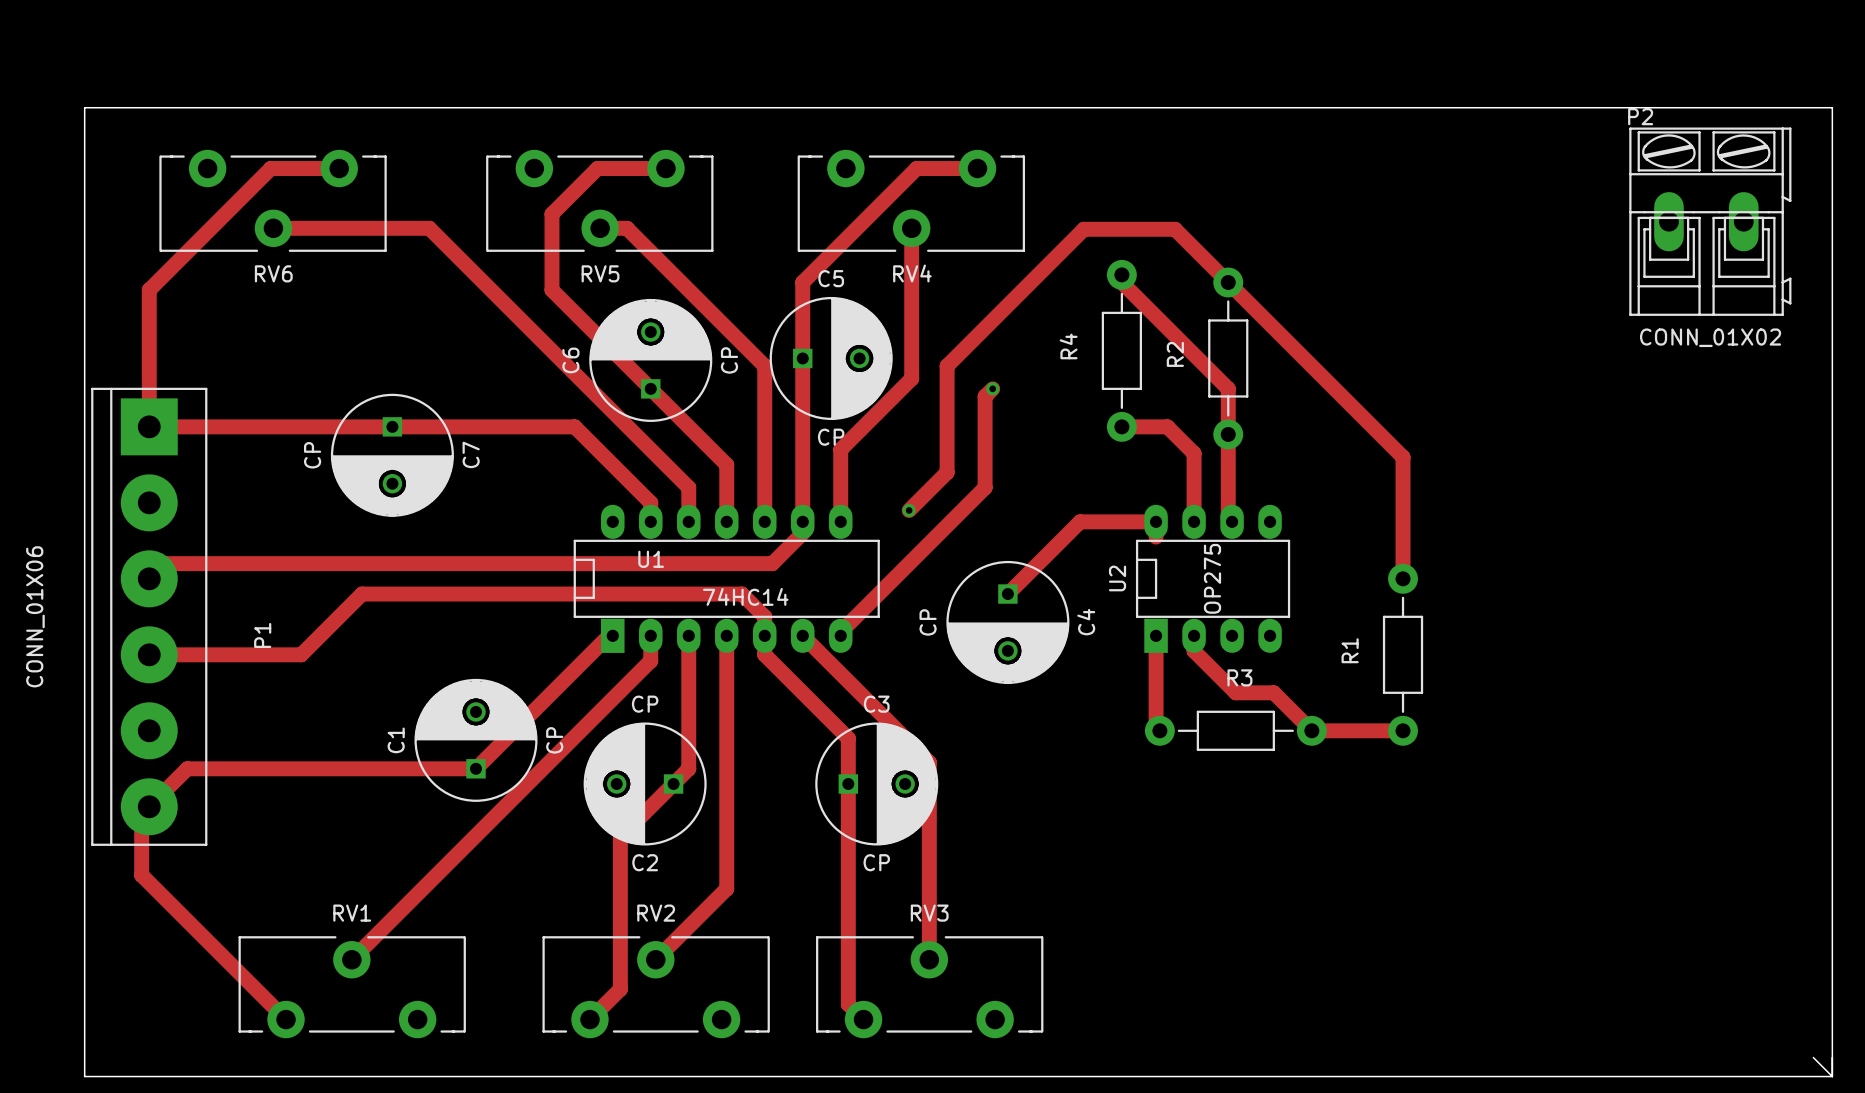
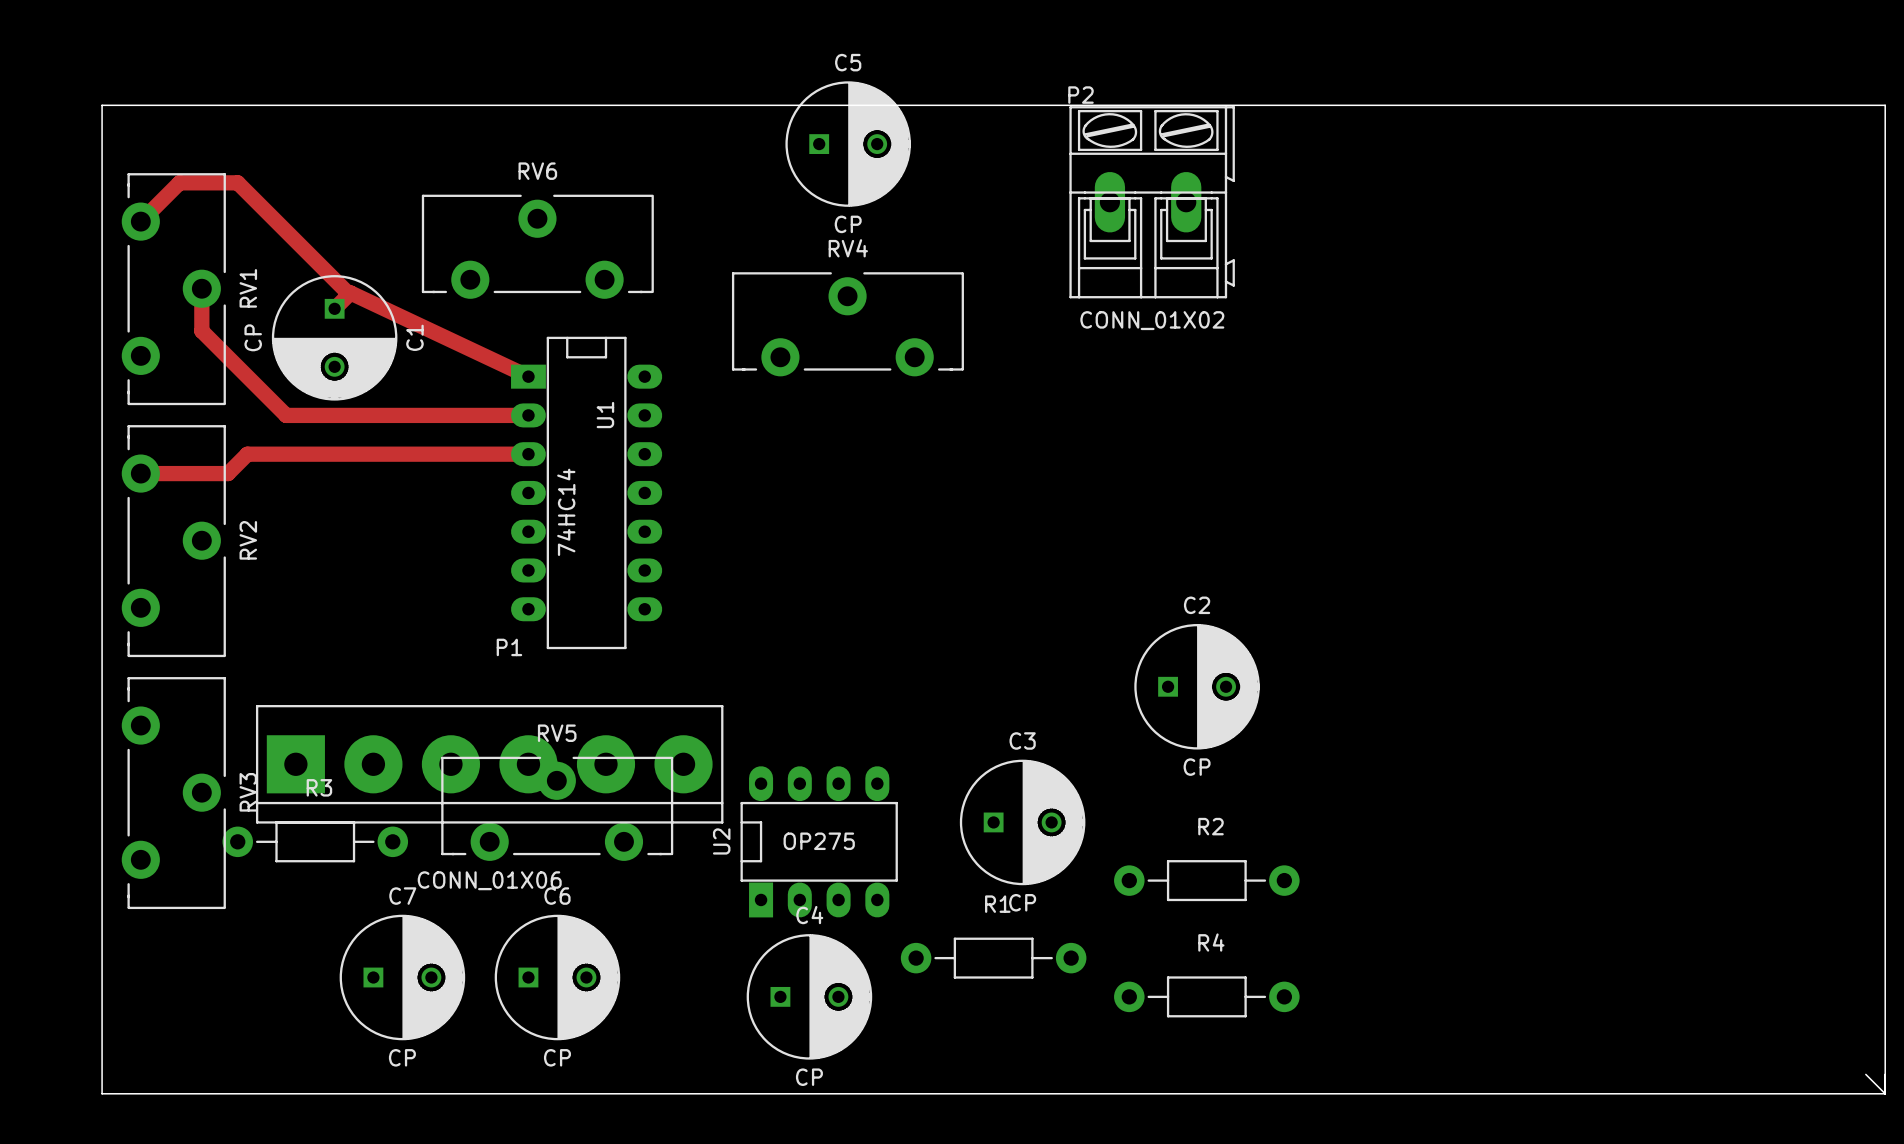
track: (339, 168) (270, 168) (149, 290) (149, 426) (574, 426) (650, 502) (650, 521) -> none
track: (665, 168) (597, 168) (551, 214) (551, 290) (726, 464) (726, 521) -> none
track: (977, 168) (916, 168) (802, 282) (802, 533) (772, 563) (164, 563) (149, 578) -> none
RV6 rotation: 0° (273, 200) -> 180° (537, 246)
RV6 position: (273, 200) -> (537, 246)
RV5 rotation: 0° (599, 200) -> 180° (557, 808)
RV5 position: (599, 200) -> (557, 808)
RV4 rotation: 0° (911, 200) -> 180° (847, 324)
RV4 position: (911, 200) -> (847, 324)
track: none -> (140, 221) (179, 182) (237, 182) (349, 294)
P2 position: (1710, 221) -> (1152, 202)
track: (273, 228) (429, 228) (688, 487) (688, 521) -> none
track: (600, 228) (626, 228) (764, 366) (764, 521) -> none
track: (911, 228) (911, 378) (840, 449) (840, 521) -> none
track: (1121, 274) (1121, 282) (1228, 388) (1228, 518) -> none
track: none -> (201, 288) (201, 331) (286, 415) (528, 415)
track: none -> (334, 308) (350, 292) (528, 376)
R4 rotation: 0° (1121, 350) -> 90° clockwise (1206, 996)
R4 position: (1121, 350) -> (1206, 996)
C5 position: (831, 358) -> (848, 144)
R2 rotation: 0° (1228, 358) -> 90° clockwise (1206, 880)
R2 position: (1228, 358) -> (1206, 880)
C6 rotation: 0° (650, 360) -> 90° clockwise (557, 977)
C6 position: (650, 360) -> (557, 977)
track: (992, 388) (985, 396) (985, 487) (840, 632) (840, 635) -> none
via: (992, 388) -> none
track: (1121, 426) (1167, 426) (1194, 453) (1194, 521) -> none
track: none -> (528, 454) (247, 454) (228, 473) (140, 473)
C7 rotation: 0° (392, 455) -> 90° counterclockwise (402, 977)
C7 position: (392, 455) -> (402, 977)
track: (909, 510) (947, 472) (947, 366) (1083, 229) (1175, 229) (1403, 457) (1403, 578) -> none
via: (909, 510) -> none
track: (1156, 537) (1156, 521) (1080, 521) (1007, 594) -> none
U1 rotation: 0° (726, 578) -> 90° clockwise (586, 492)
U1 position: (726, 578) -> (586, 492)
U2 value rotation: 0° (1212, 578) -> 90° clockwise (819, 841)
U2 position: (1213, 578) -> (819, 841)
P1 rotation: 0° (149, 616) -> 90° counterclockwise (489, 764)
P1 position: (149, 616) -> (489, 764)
C4 rotation: 0° (1007, 622) -> 90° counterclockwise (809, 996)
C4 position: (1007, 622) -> (809, 996)
track: (612, 635) (608, 635) (476, 768) (187, 768) (141, 814) (141, 875) (286, 1019) -> none
track: (650, 635) (650, 660) (351, 959) -> none
track: (688, 635) (688, 768) (620, 837) (620, 989) (589, 1019) -> none
track: (726, 635) (726, 888) (655, 959) -> none
track: (802, 635) (929, 762) (929, 959) -> none
track: (1156, 635) (1156, 727) (1159, 730) -> none
track: (1194, 635) (1194, 651) (1235, 692) (1273, 692) (1311, 730) (1403, 730) -> none
track: (149, 654) (301, 654) (362, 594) (741, 594) (764, 616) (764, 654) (848, 738) (848, 1004) (863, 1019) -> none
R1 rotation: 0° (1403, 654) -> 90° clockwise (993, 958)
R1 position: (1403, 654) -> (993, 958)
R3 position: (1235, 730) -> (315, 841)
C1 rotation: 0° (476, 740) -> 180° (334, 337)
C1 position: (476, 740) -> (334, 337)
C2 rotation: 0° (645, 783) -> 180° (1197, 686)
C2 position: (645, 783) -> (1197, 686)
C3 position: (876, 783) -> (1022, 822)
RV1 rotation: 0° (352, 987) -> 90° clockwise (173, 289)
RV1 position: (352, 987) -> (173, 289)
RV2 rotation: 0° (656, 987) -> 90° clockwise (173, 541)
RV2 position: (656, 987) -> (173, 541)
RV3 rotation: 0° (929, 987) -> 90° clockwise (173, 793)
RV3 position: (929, 987) -> (173, 793)

